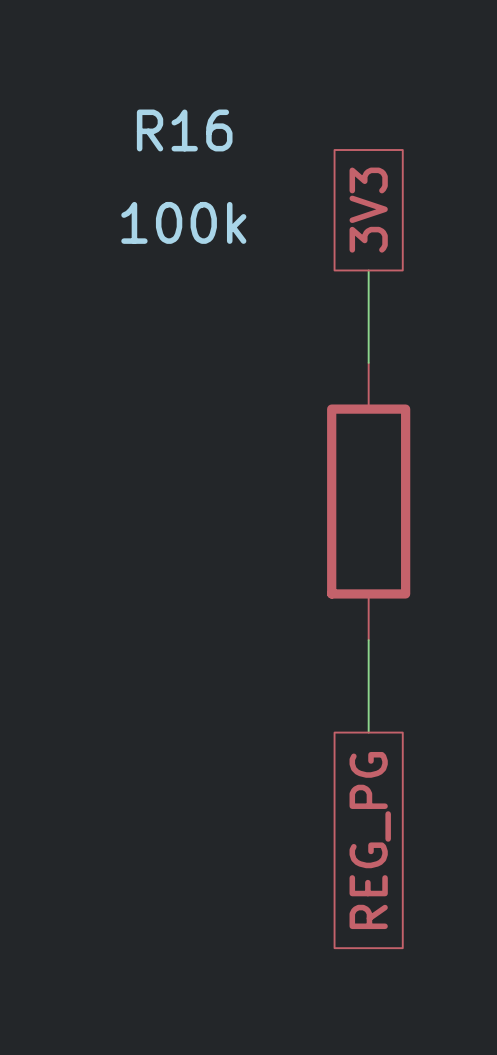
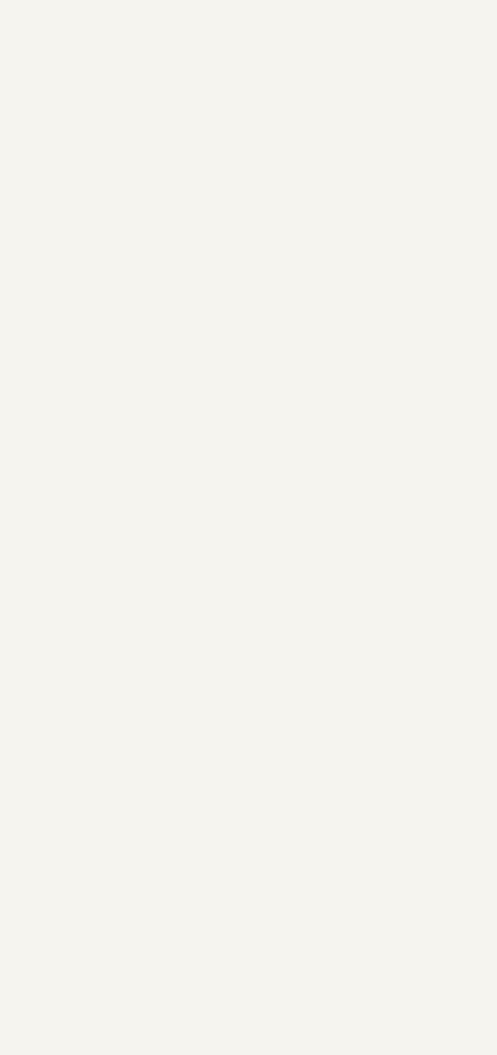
global label: 3V3 (368, 210) -> none
wire: (368, 270) (368, 362) -> none
R16: 100k (368, 501) -> none
wire: (368, 640) (368, 732) -> none
global label: REG_PG (370, 840) -> none

